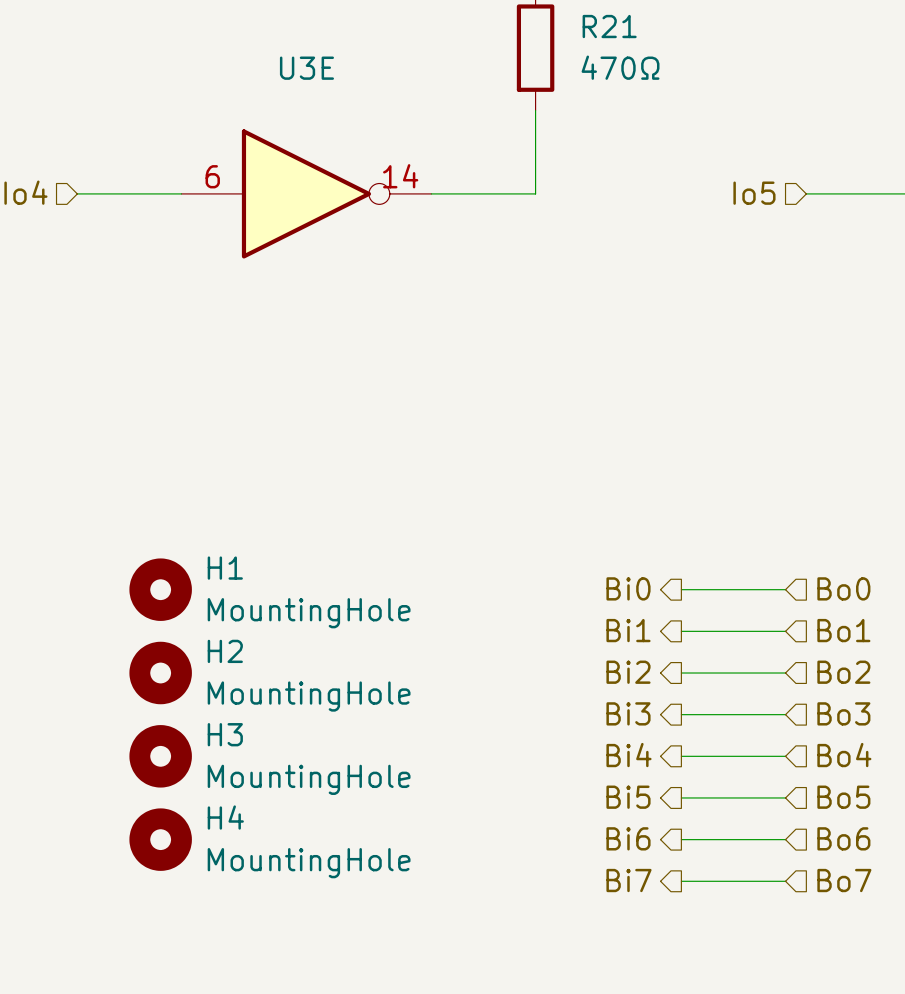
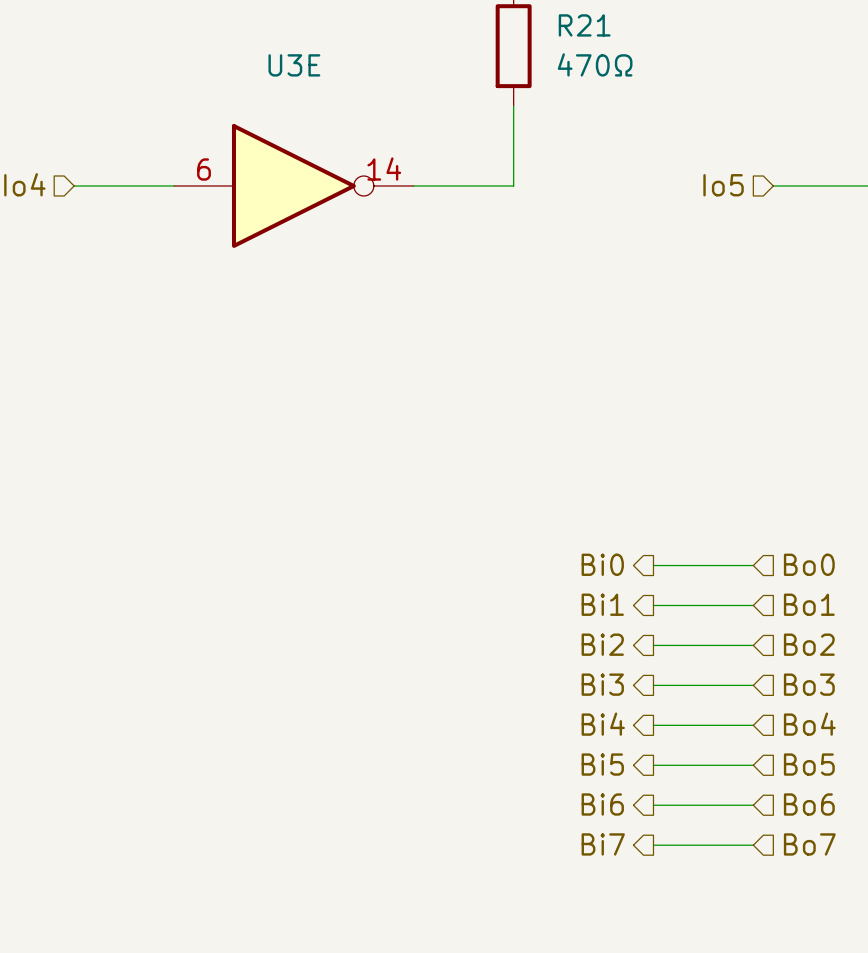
H1: MountingHole (160, 589) -> none
H2: MountingHole (160, 673) -> none
H3: MountingHole (160, 756) -> none
H4: MountingHole (160, 839) -> none

